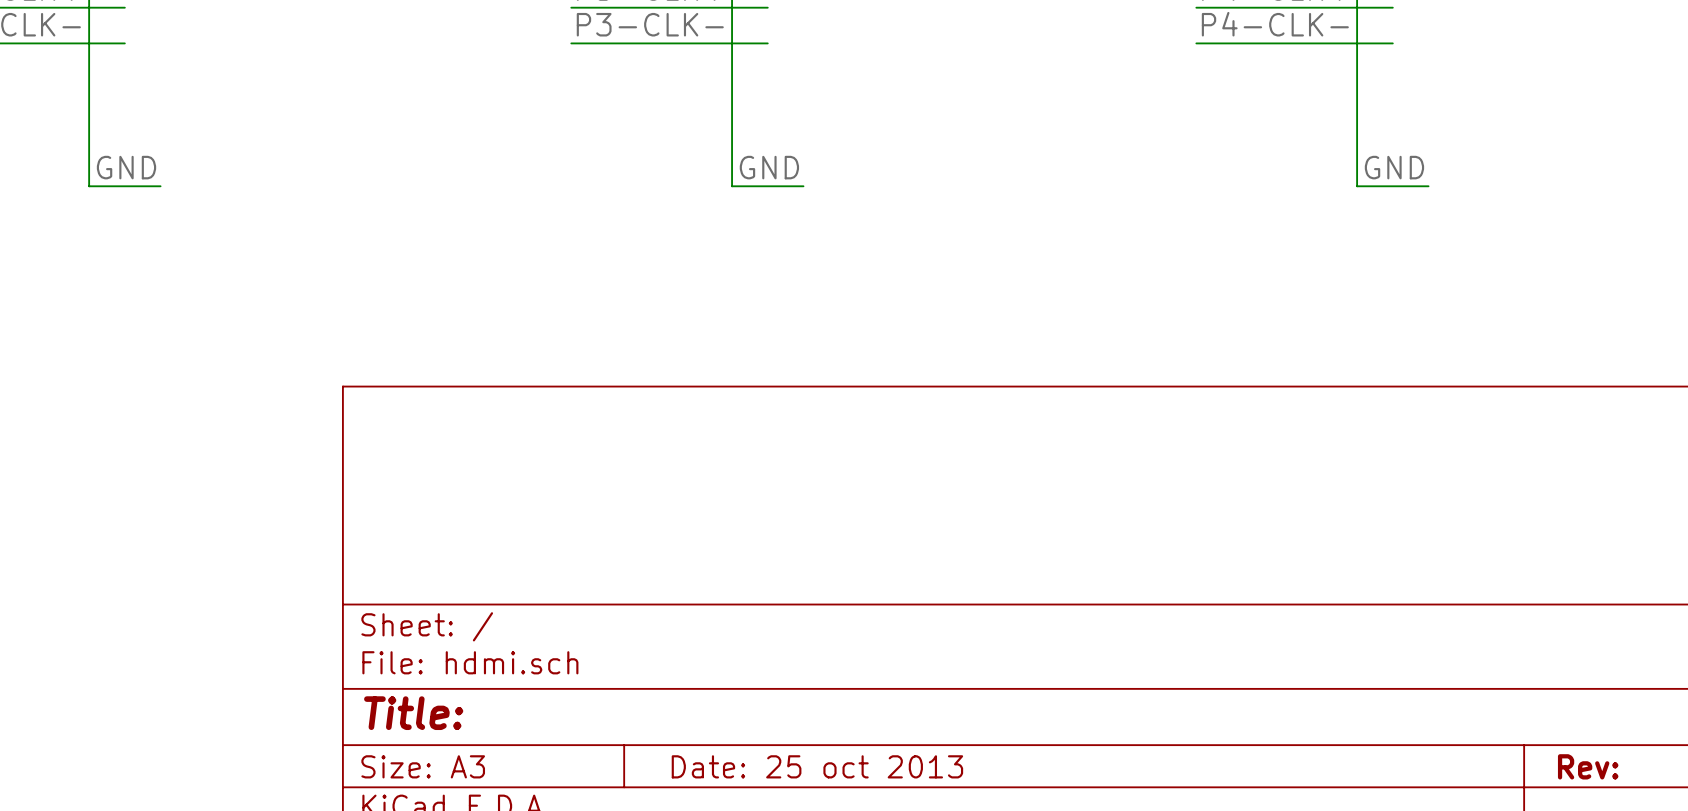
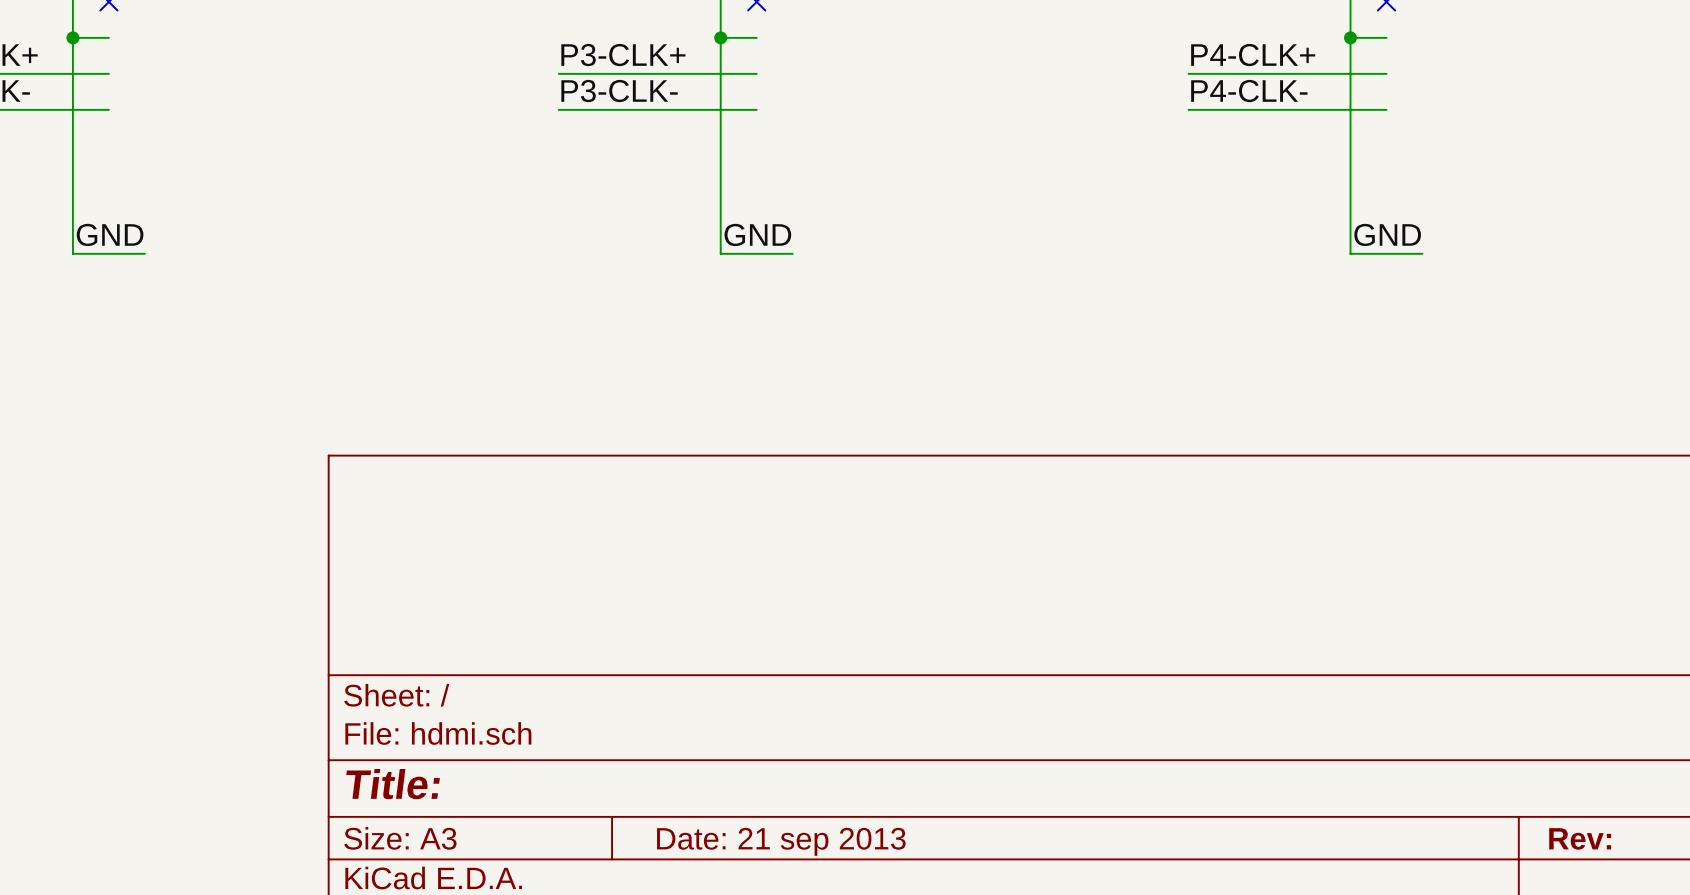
title block: Date: 25 oct 2013 (817, 766) -> Date: 21 sep 2013 (781, 841)

